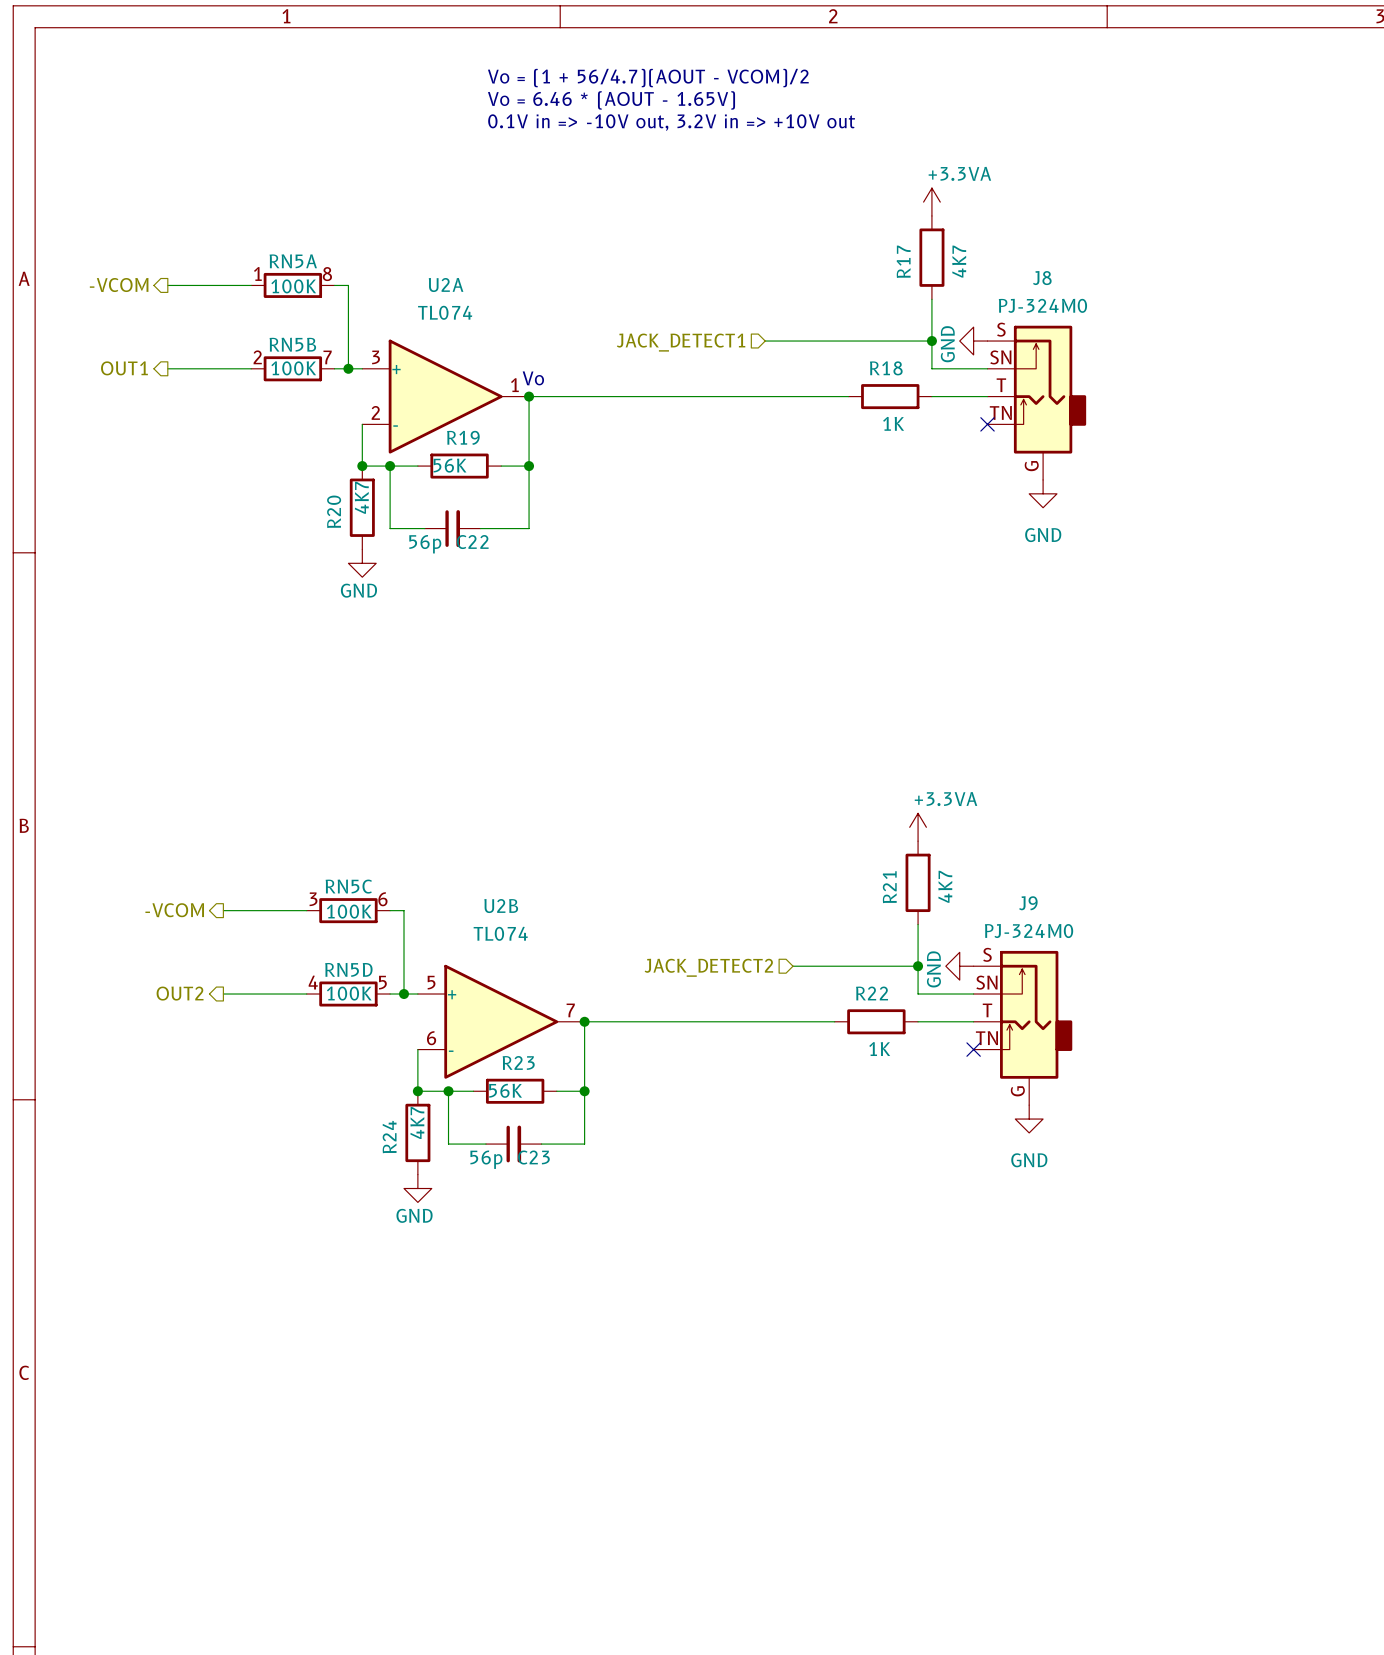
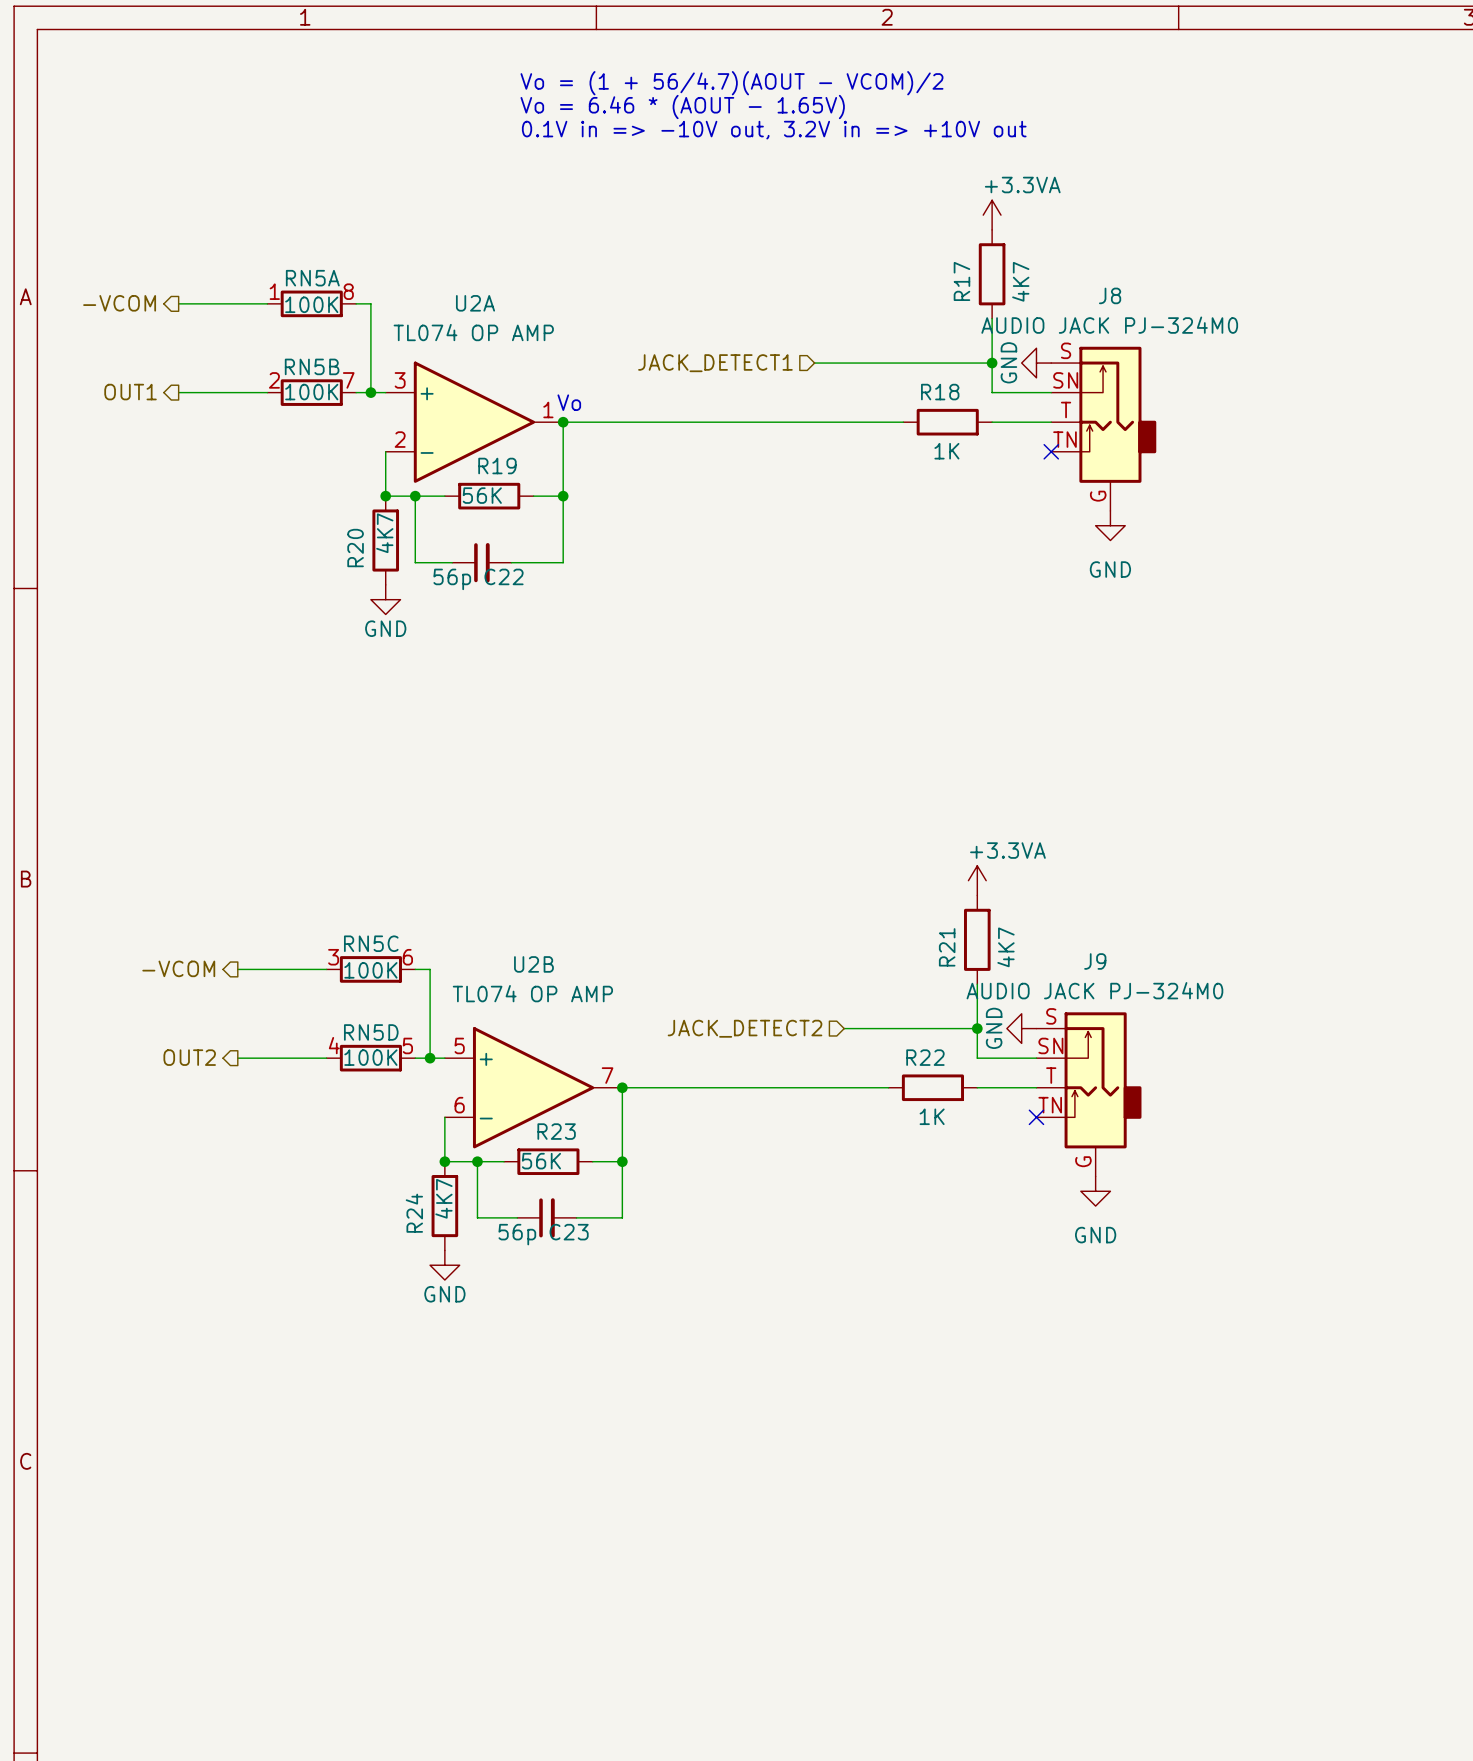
J8 value: PJ-324M0 (1042, 305) -> AUDIO JACK PJ-324M0 (1109, 325)
U2A value: TL074 (445, 312) -> TL074 OP AMP (473, 332)
J9 value: PJ-324M0 (1029, 931) -> AUDIO JACK PJ-324M0 (1094, 990)
U2B value: TL074 (500, 933) -> TL074 OP AMP (532, 993)

